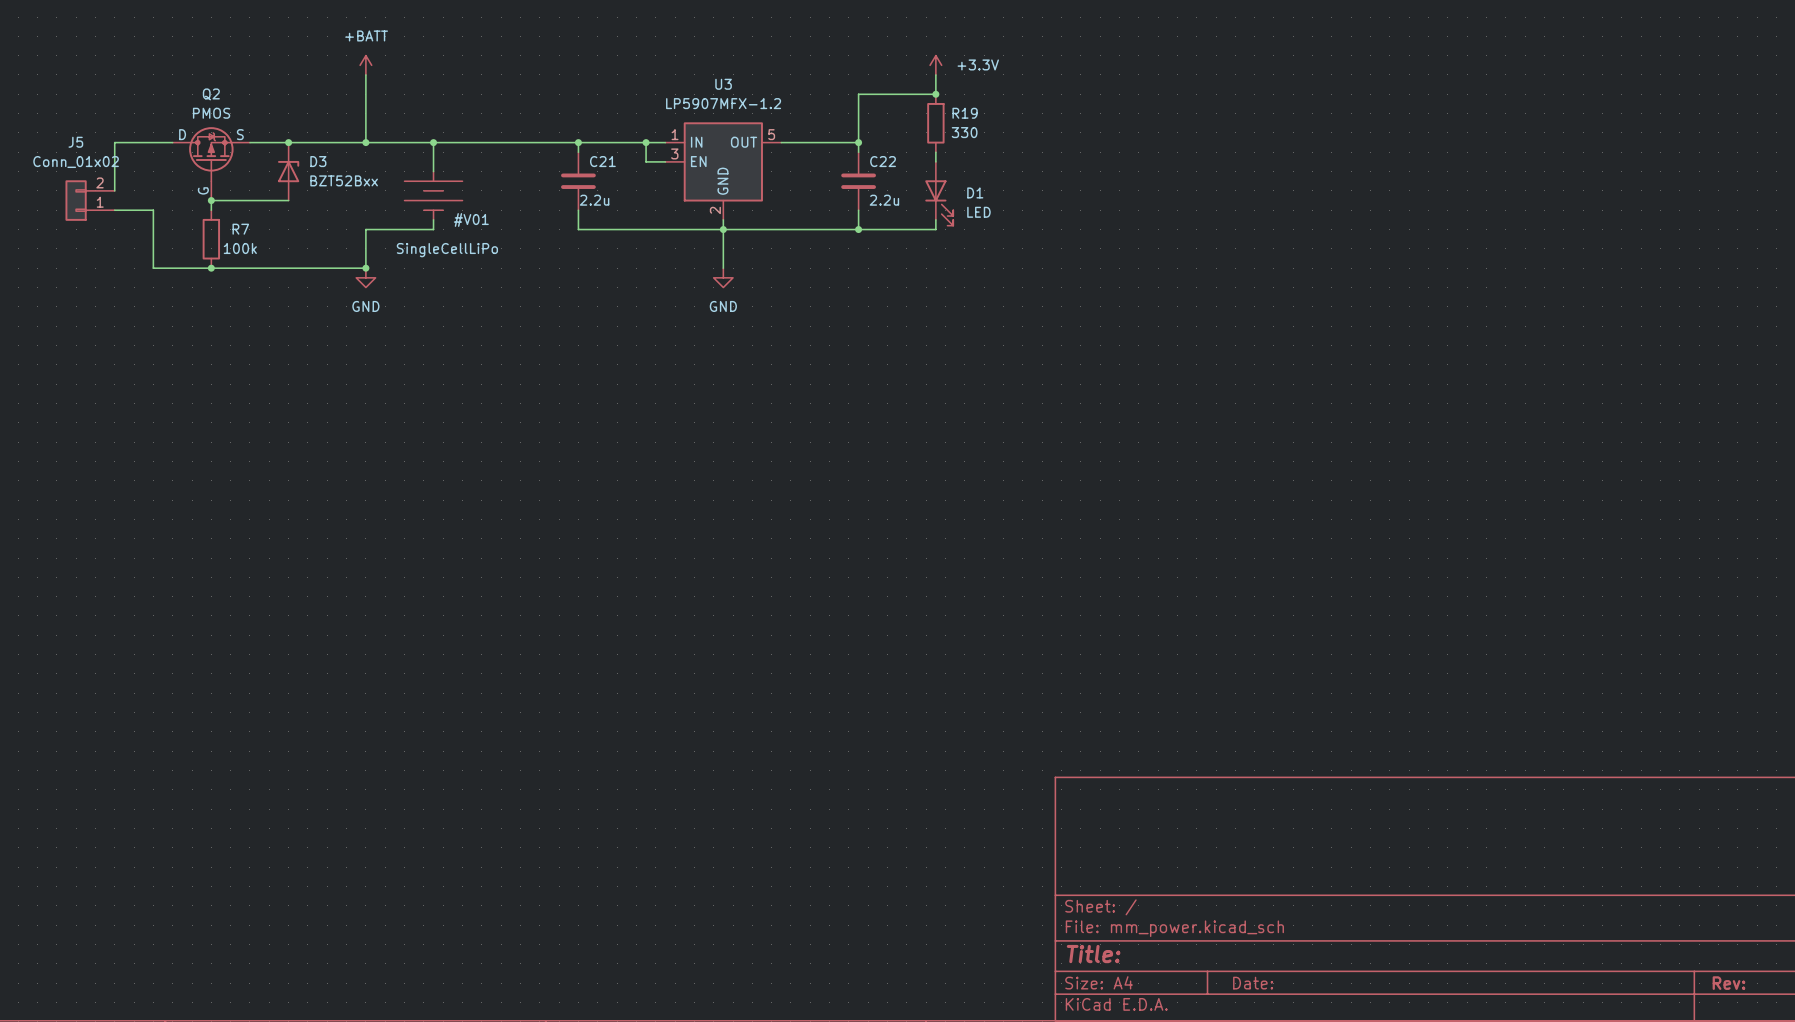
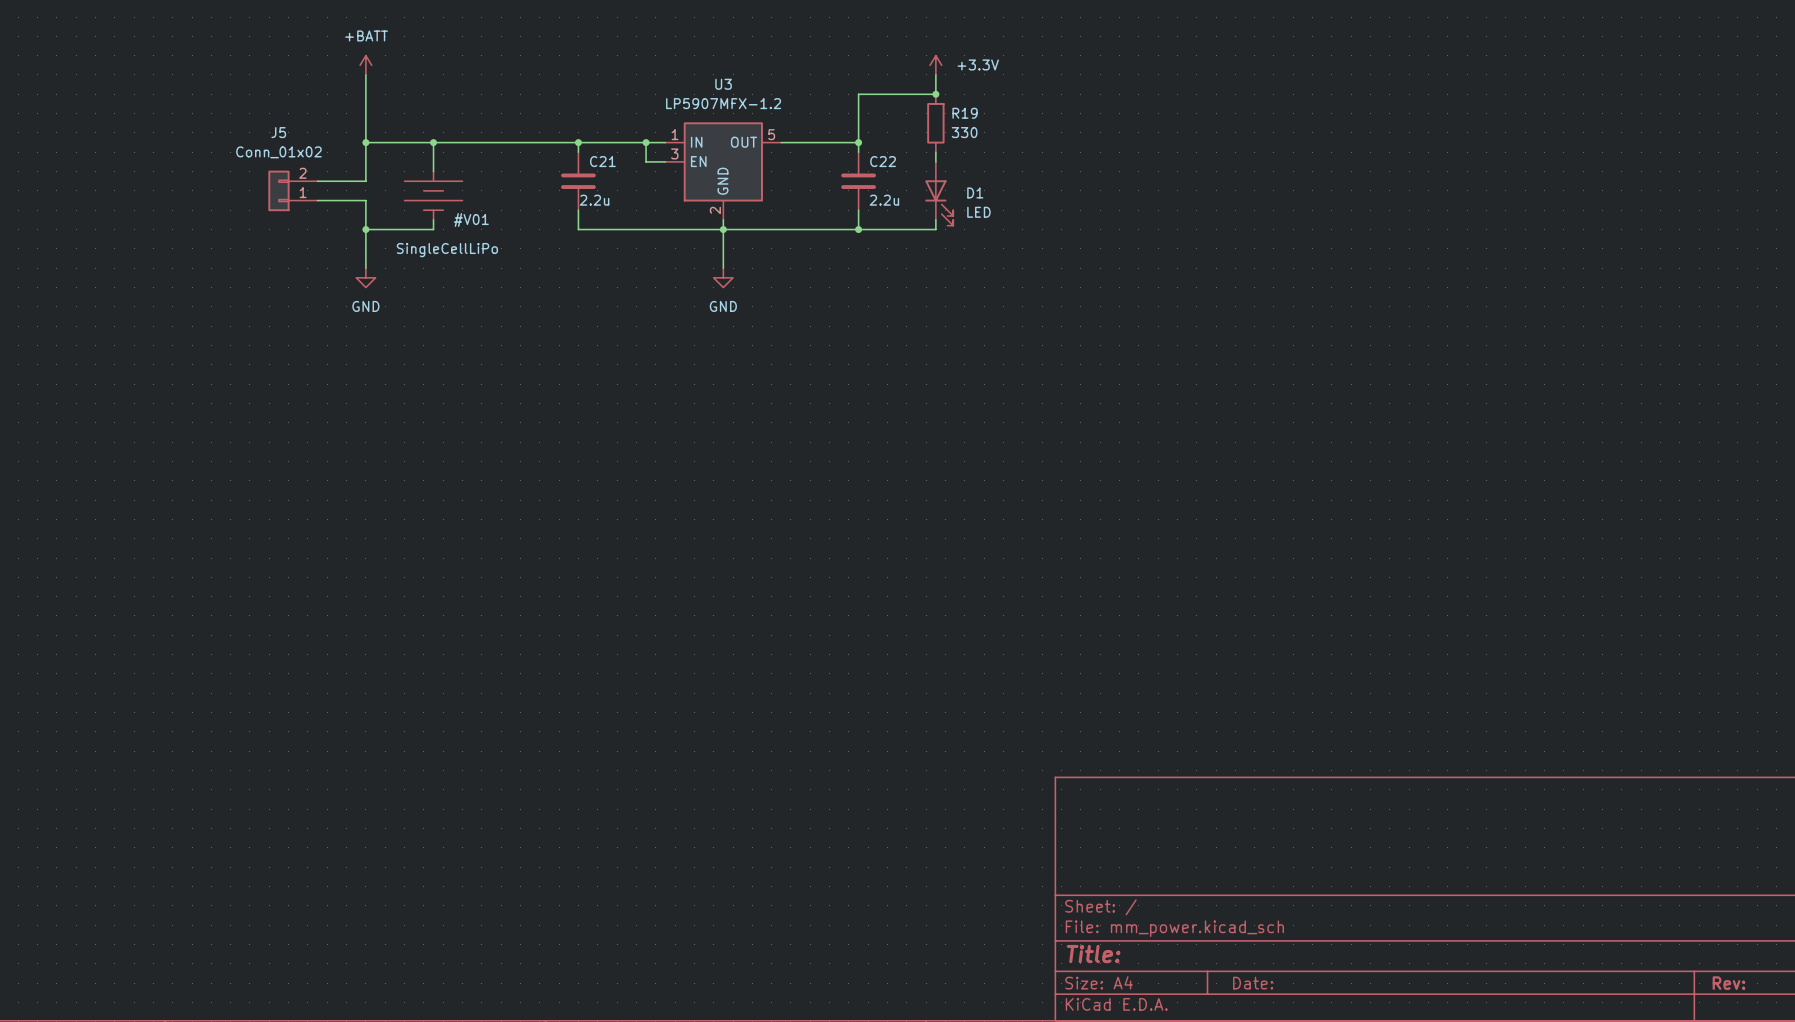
wire: (172, 142) (114, 142) (114, 190) -> none
wire: (249, 142) (365, 142) -> (317, 181) (365, 181) (365, 142)
junction: (288, 142) -> none
Q2: PMOS (211, 163) -> none
D3: BZT52Bxx (288, 171) -> none
J5 position: (90, 200) -> (292, 190)
junction: (211, 200) -> none
wire: (288, 200) (211, 200) (211, 210) -> none
wire: none -> (317, 200) (365, 200) (365, 229)
wire: (114, 210) (153, 210) (153, 268) (365, 268) -> none
R7: 100k (211, 239) -> none
junction: (211, 268) -> none
junction position: (365, 268) -> (365, 229)

